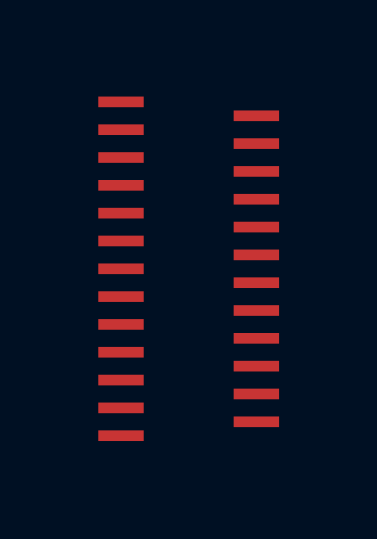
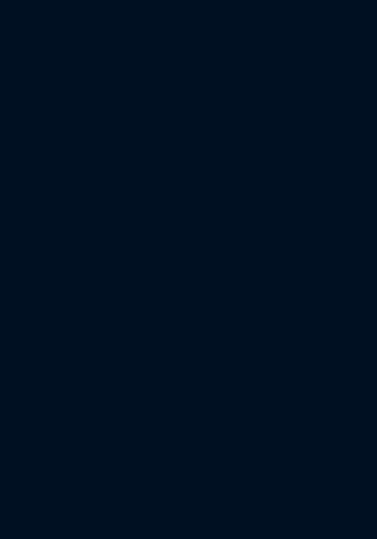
part: (188, 268) -> none

